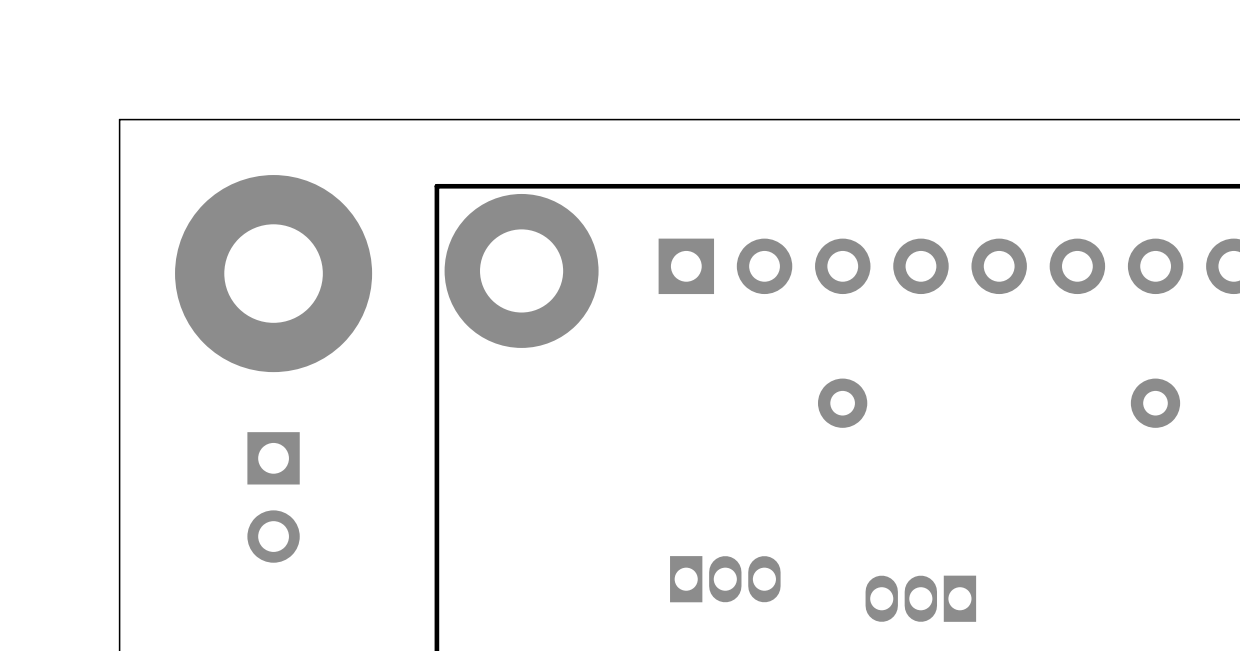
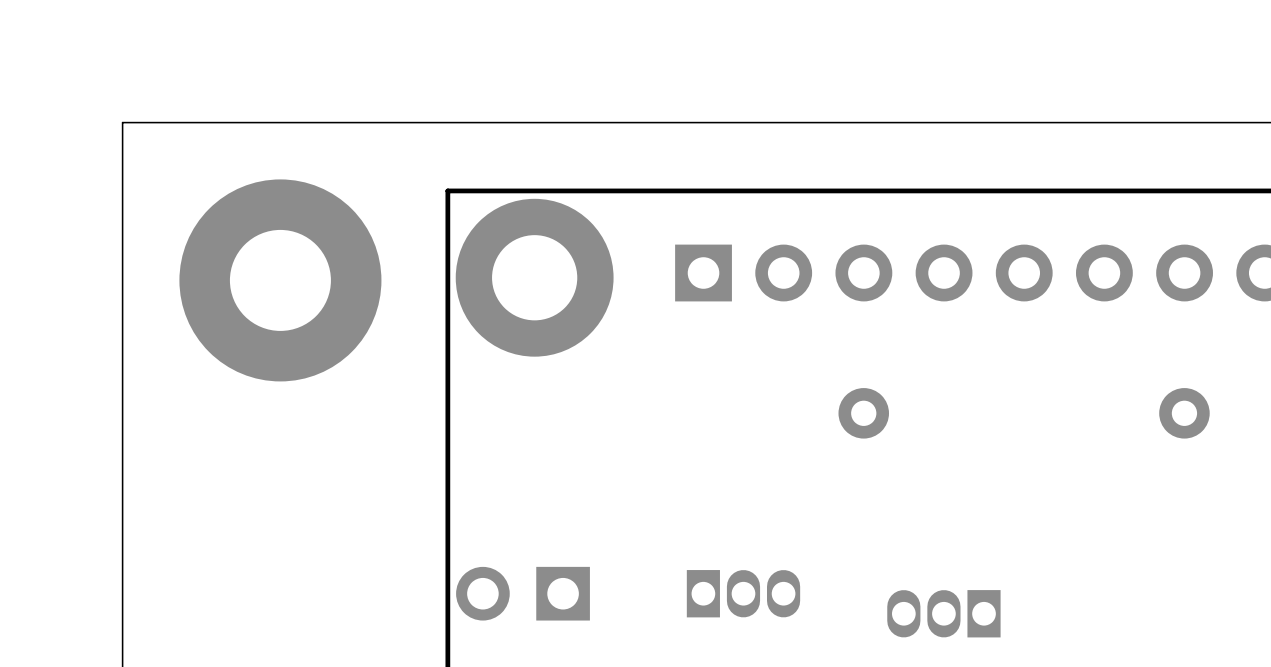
part rotation: 0° (273, 497) -> 90° clockwise (523, 593)
part position: (273, 497) -> (523, 593)

